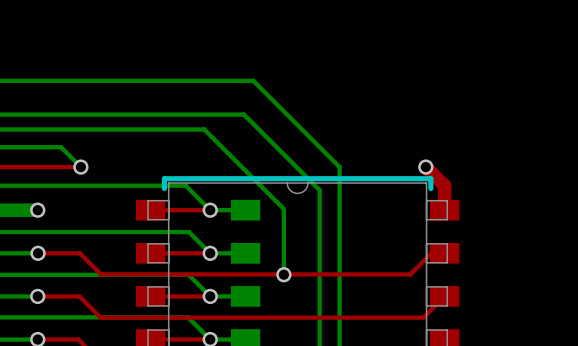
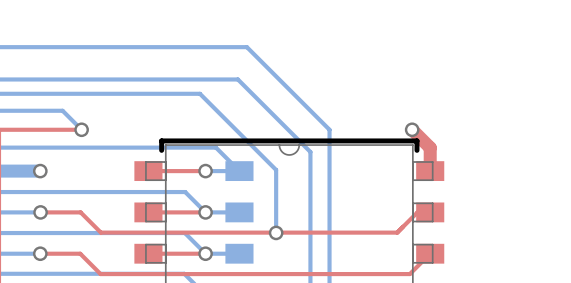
bottom track: (185, 185) (210, 210) -> (182, 147) (215, 147) (239, 171)

